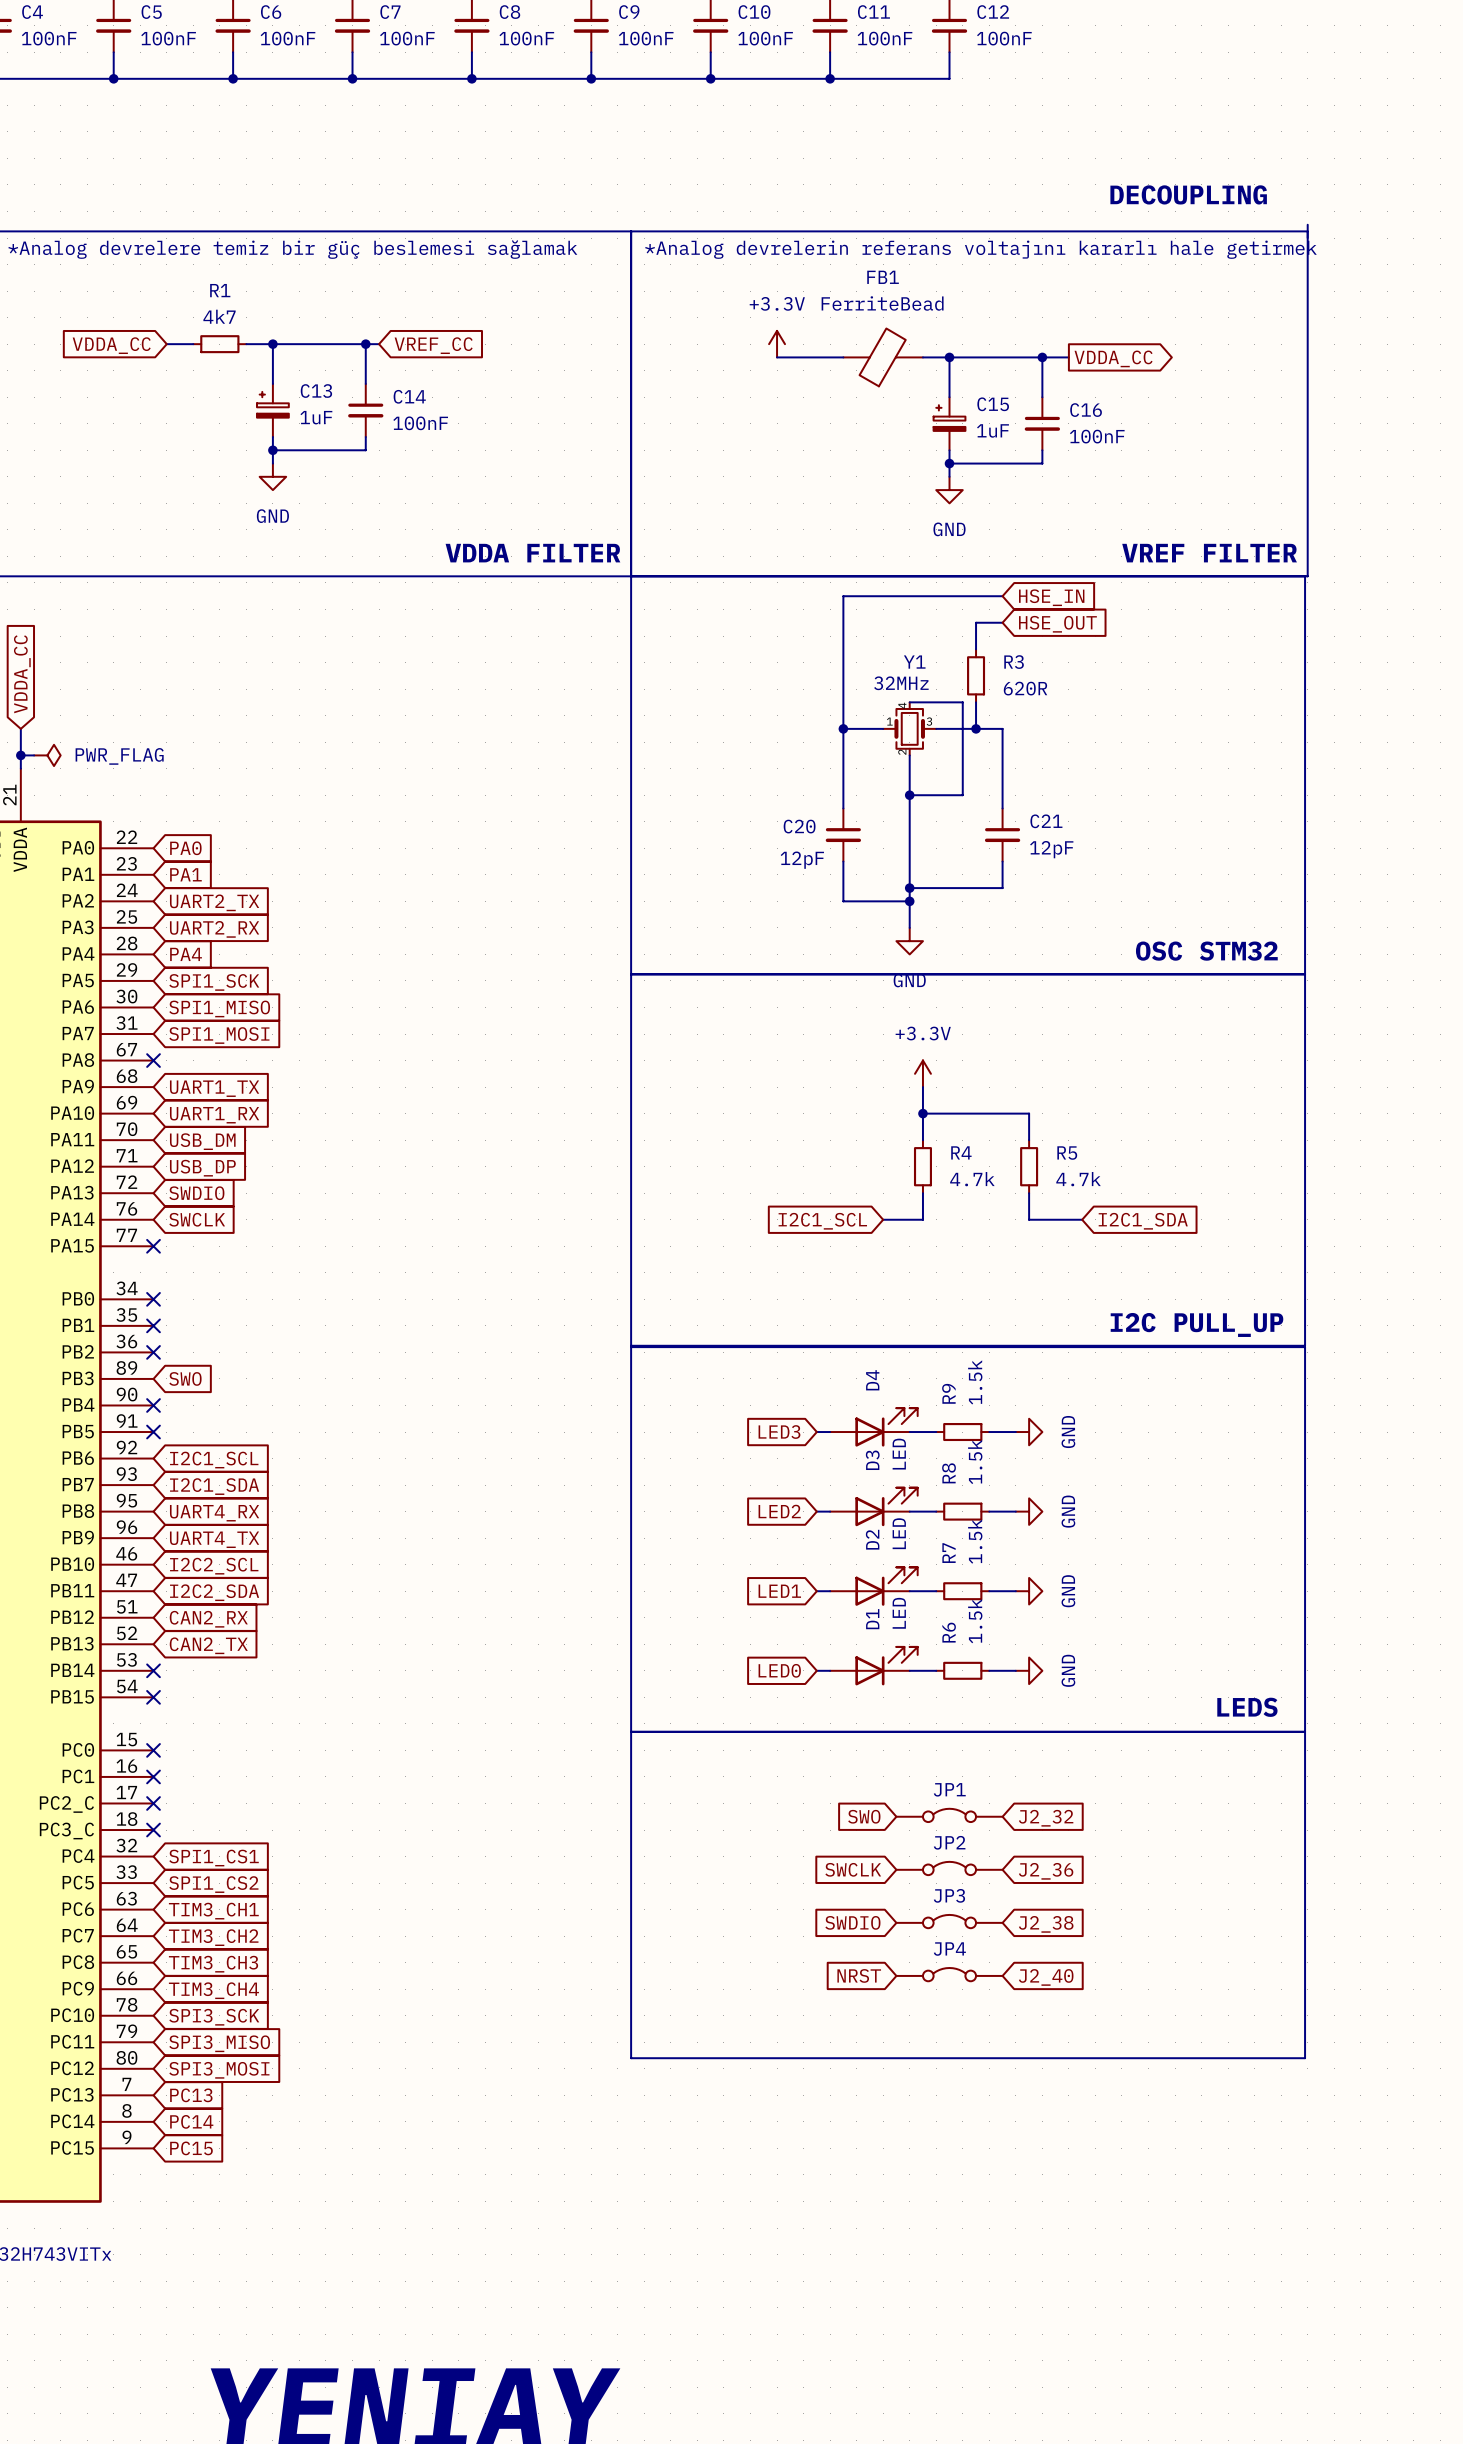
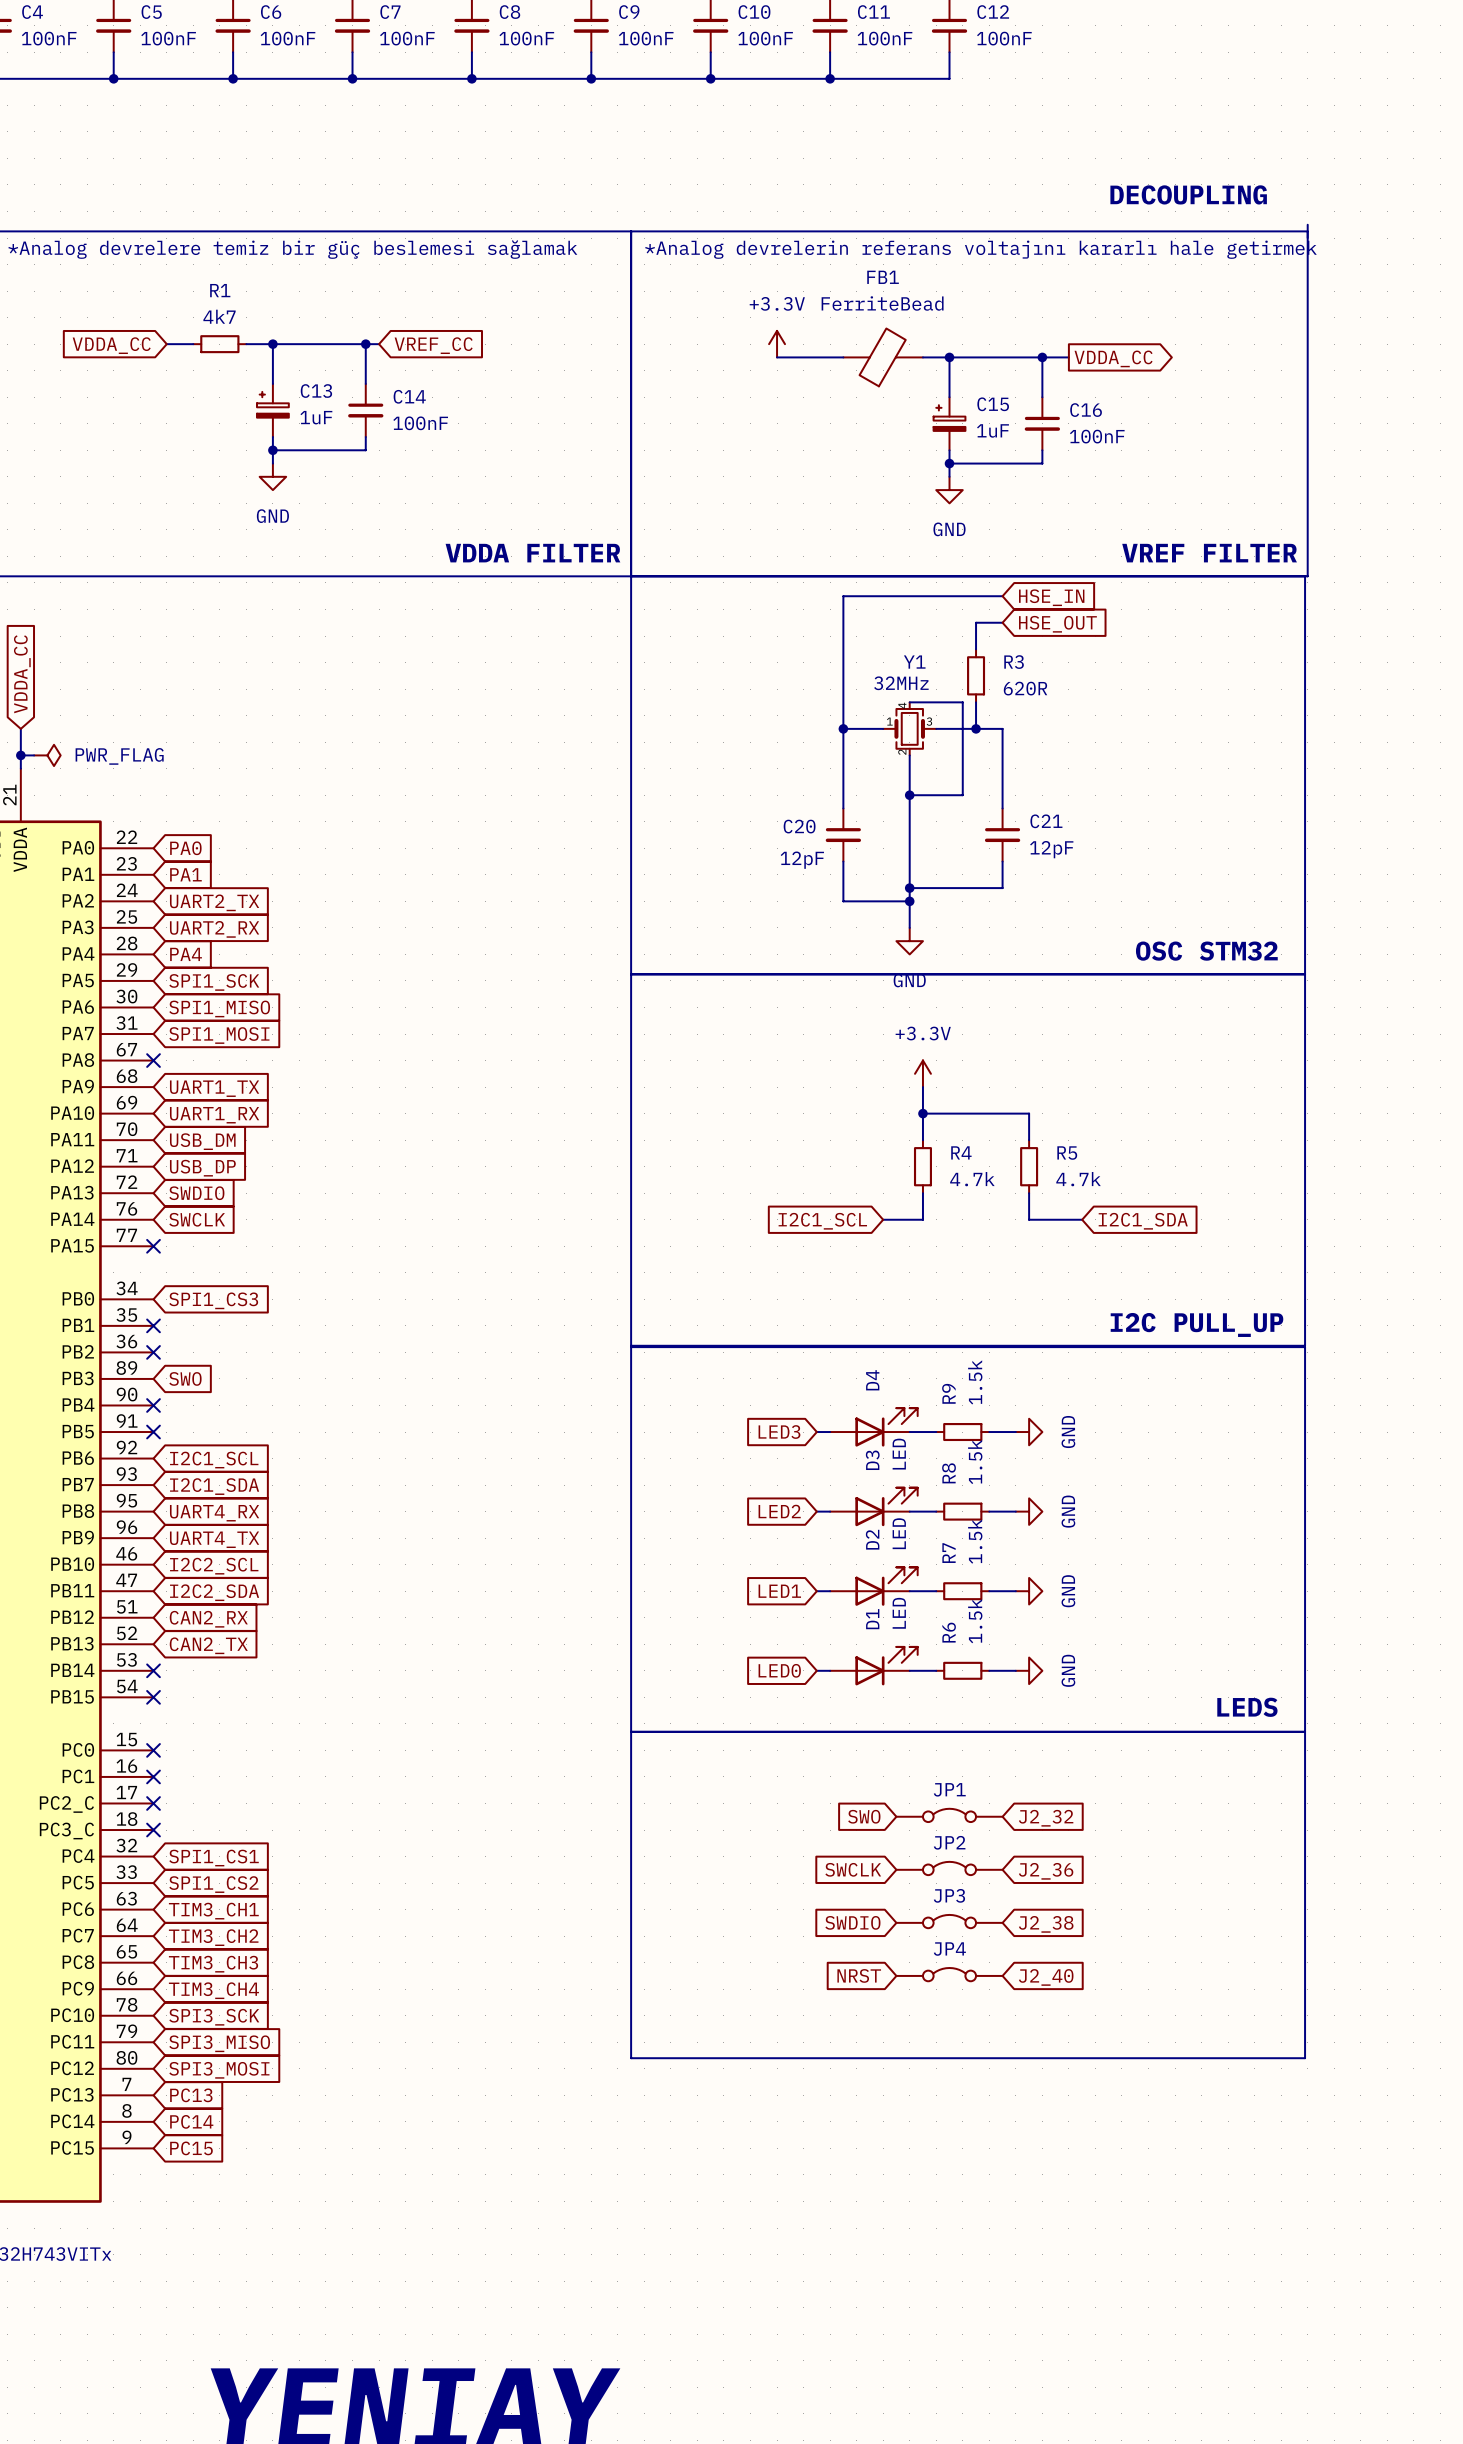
no-connect mark: (153, 1299) -> none
global label: none -> SPI1_CS3 (213, 1300)

